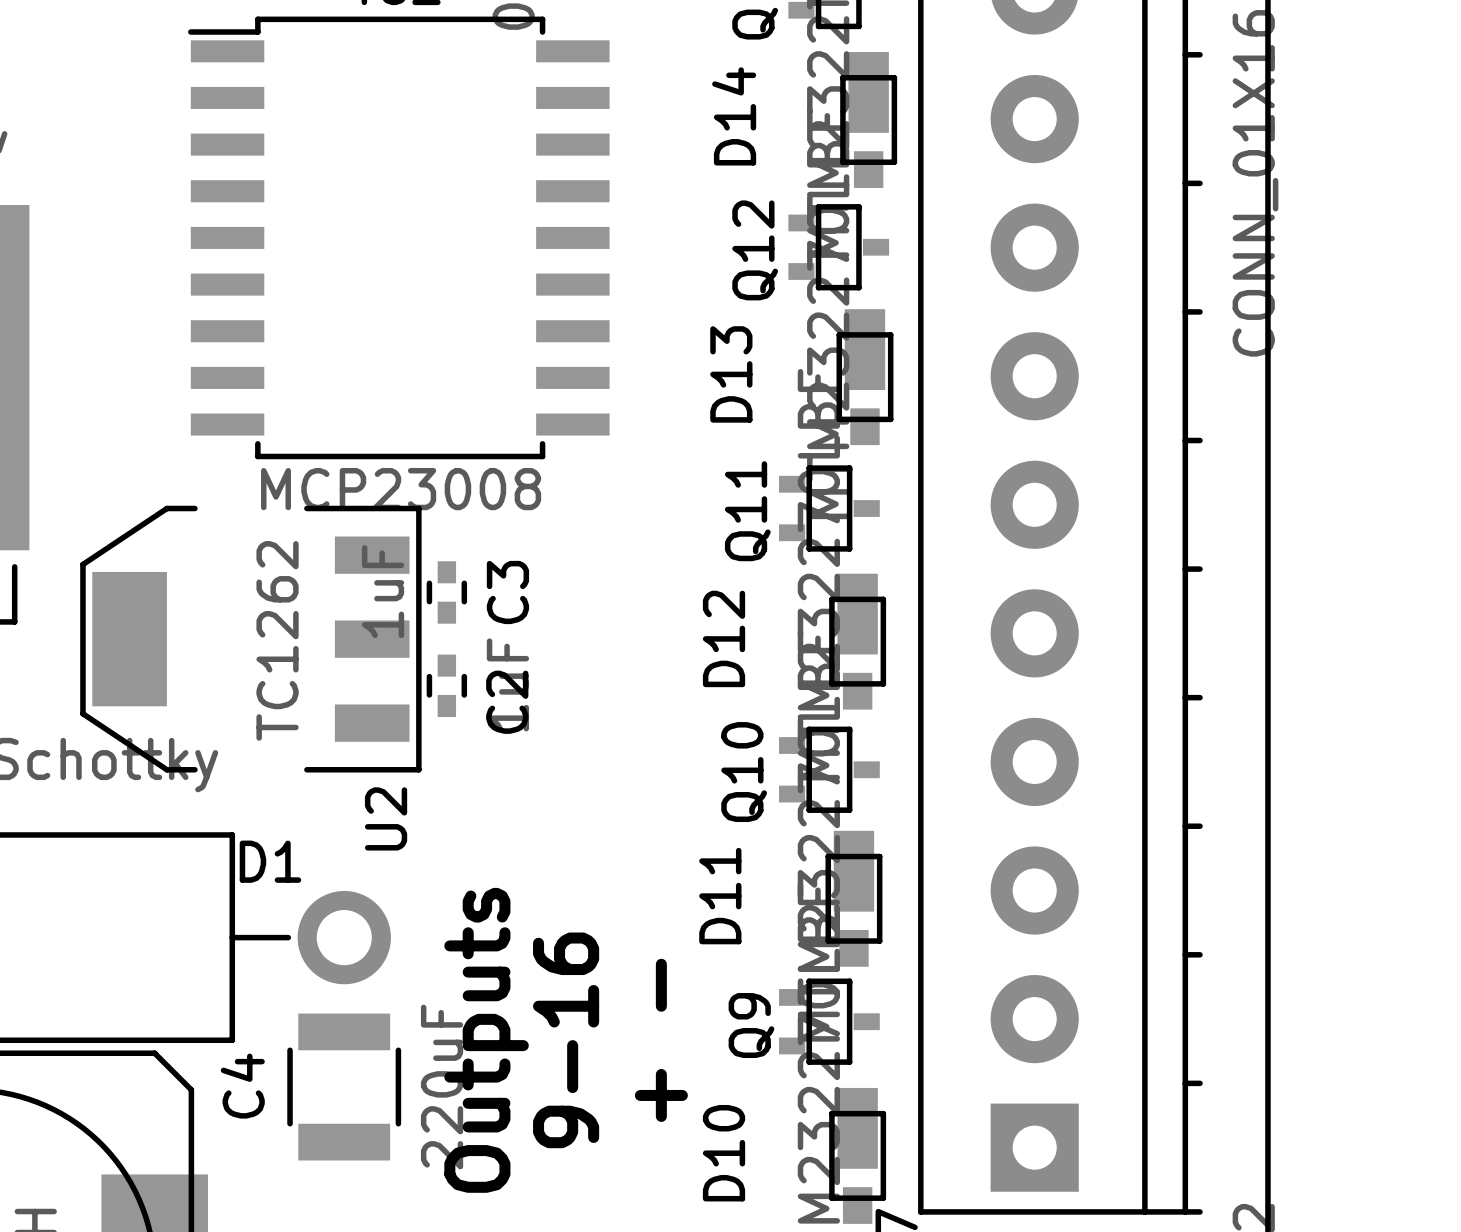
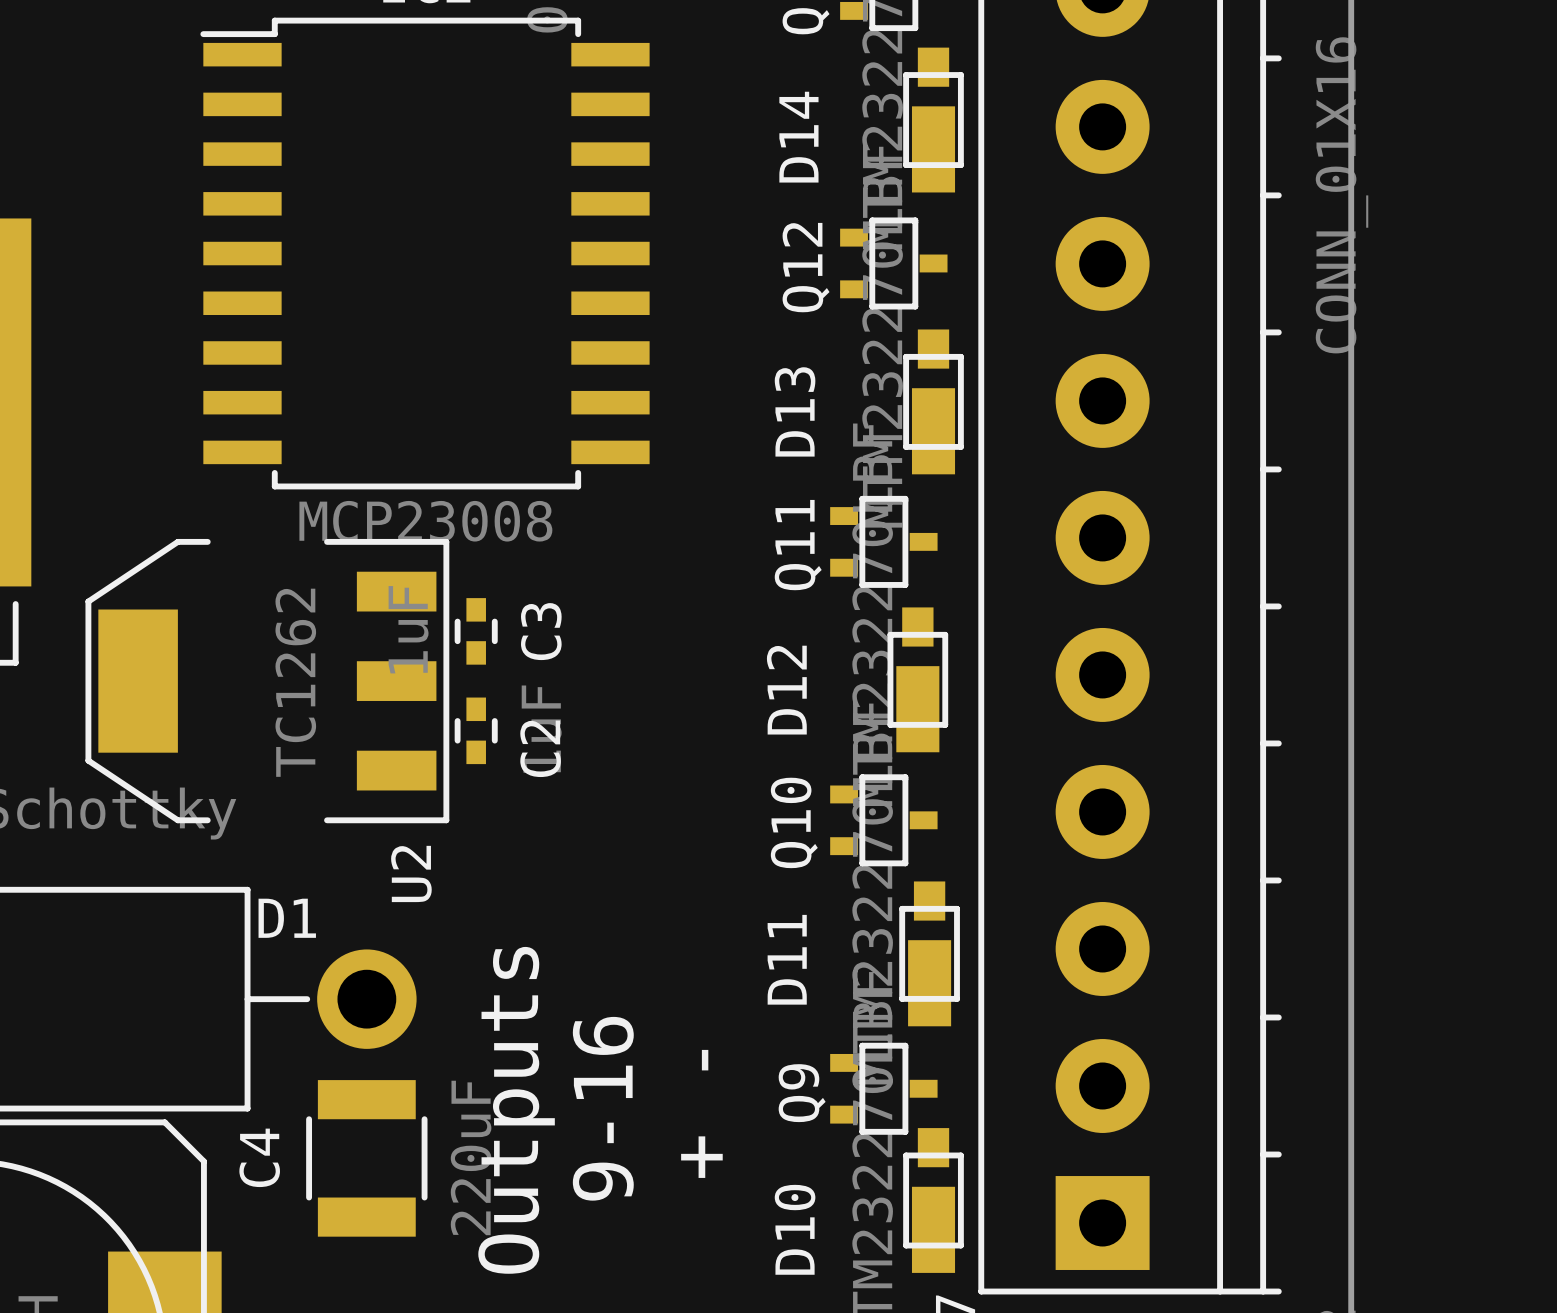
D14 rotation: 0° (868, 119) -> 180° (933, 120)
D13 rotation: 0° (864, 377) -> 180° (933, 401)
D12 rotation: 0° (857, 641) -> 180° (917, 679)
D11 rotation: 0° (853, 898) -> 180° (929, 953)
D10 rotation: 0° (857, 1155) -> 180° (933, 1200)

